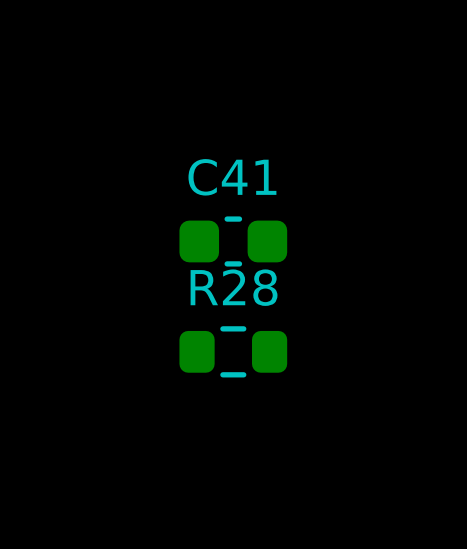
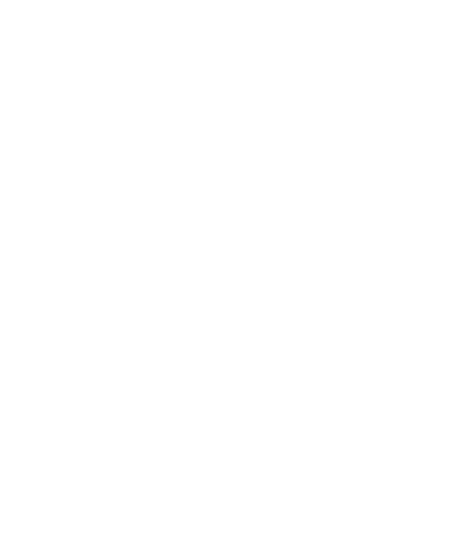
C41: (233, 241) -> none
R28: (233, 351) -> none

